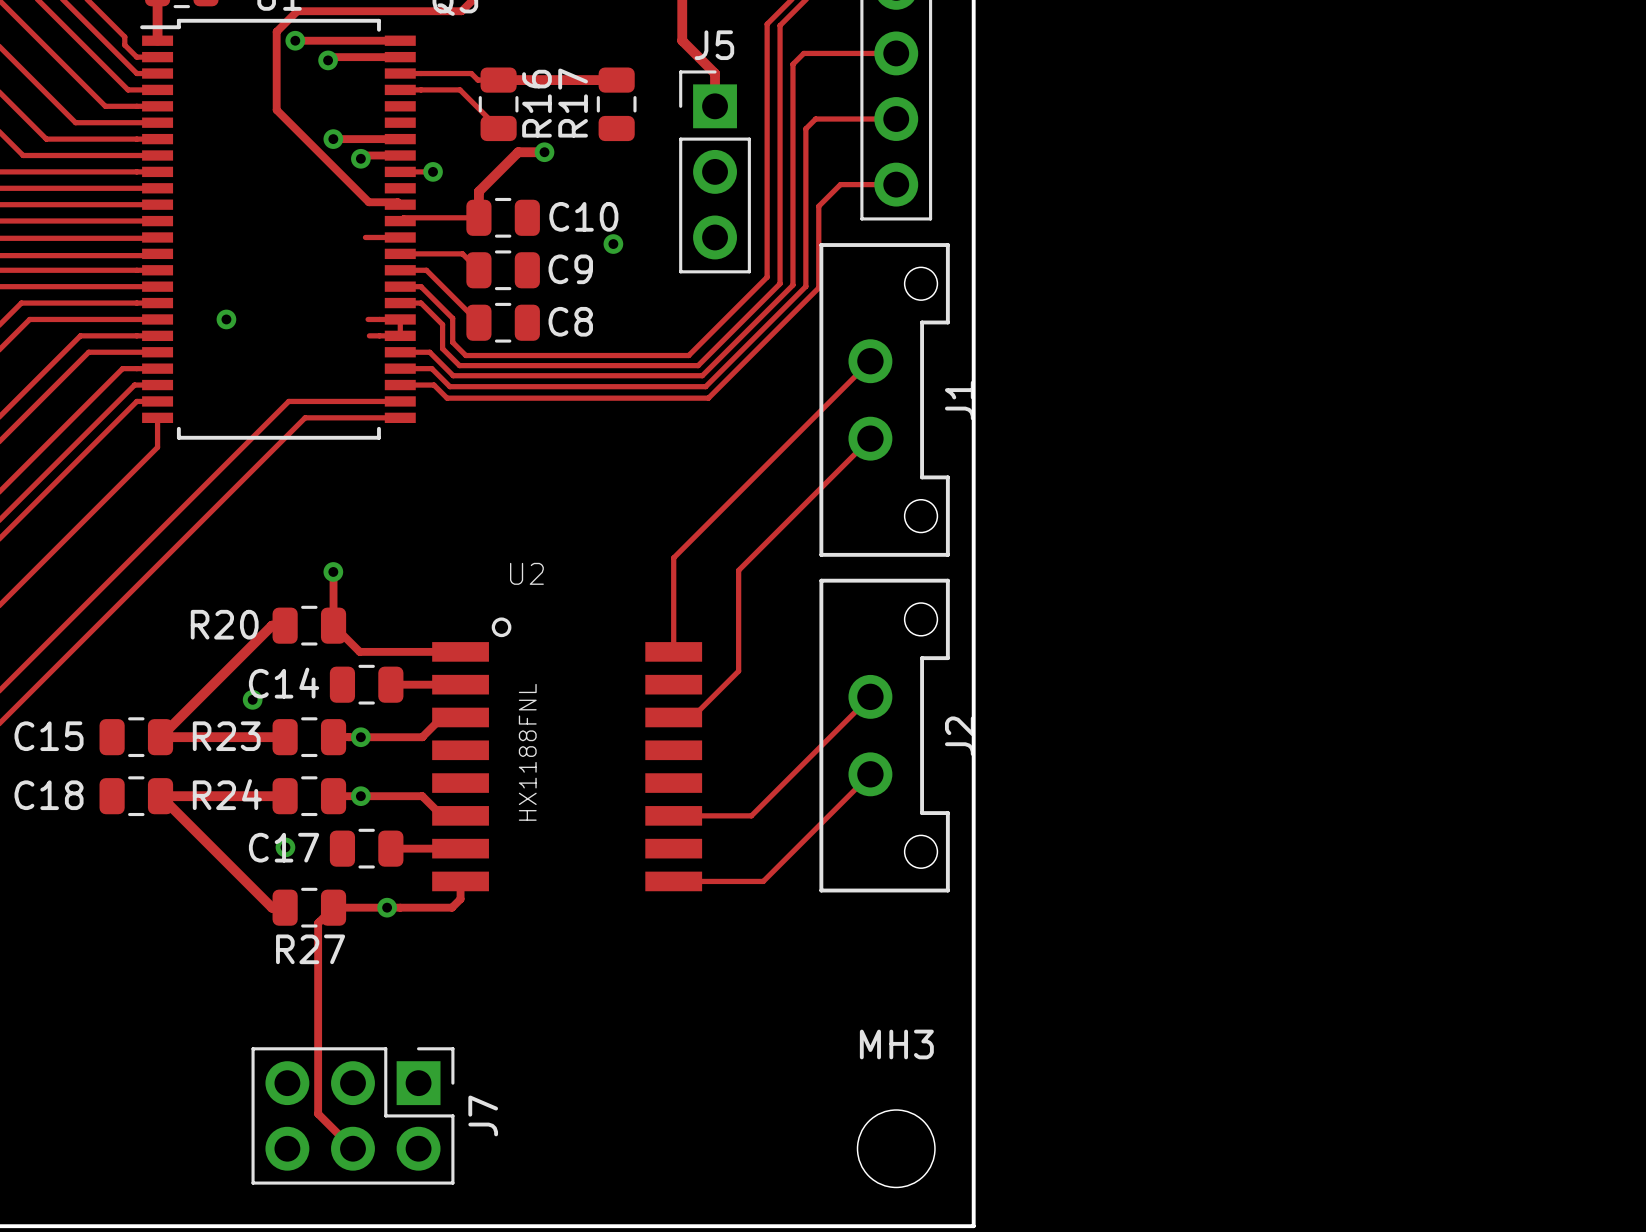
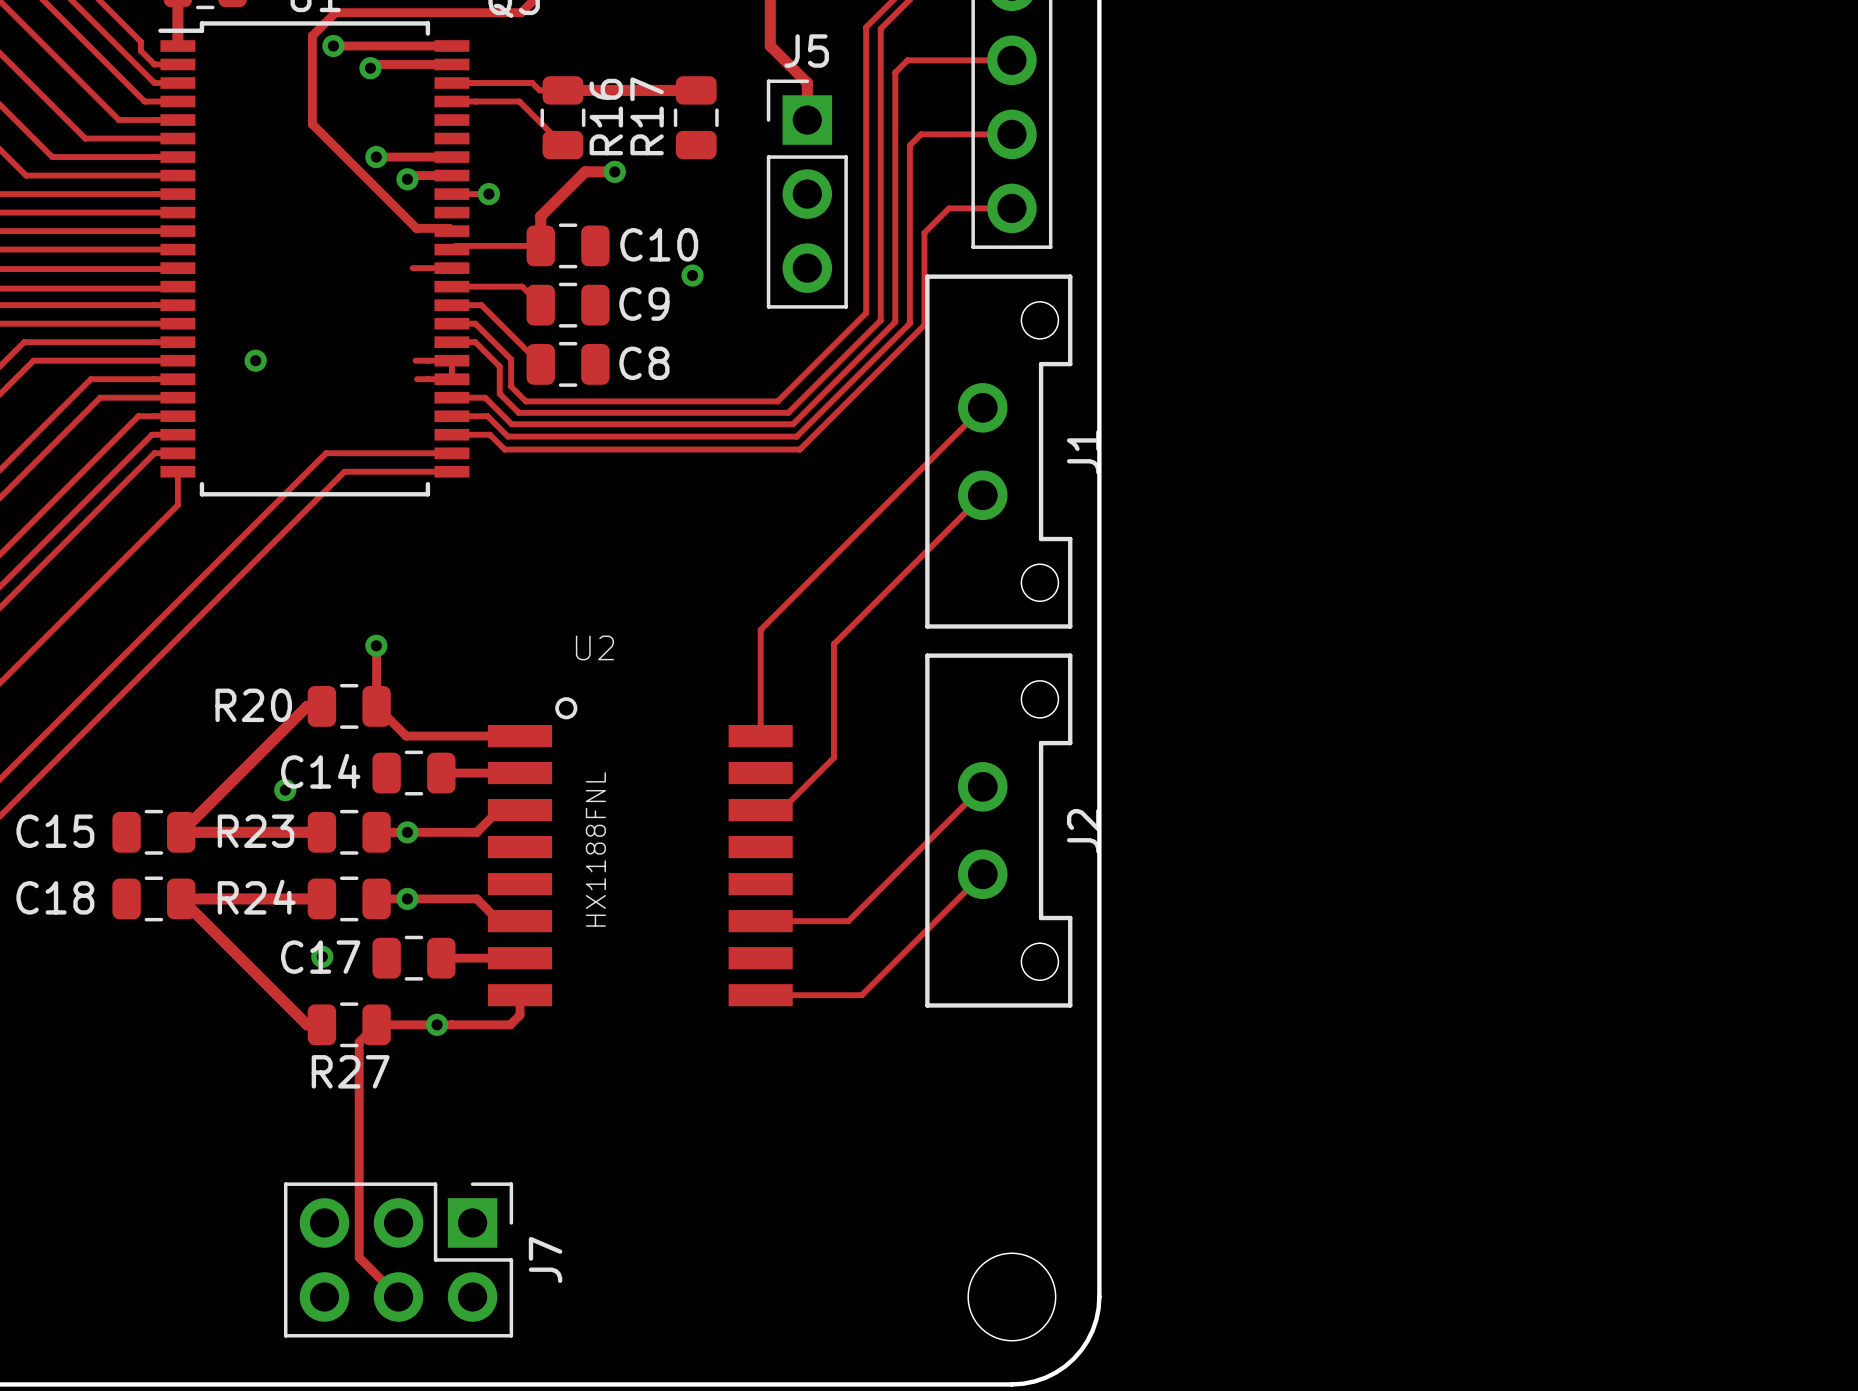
MH3 name: MH3 (896, 1044) -> none
board edge: (973, 1148) (973, 1226) (896, 1226) -> (1099, 1297) (1092, 1330) (1073, 1358) (1045, 1377) (1011, 1384)

